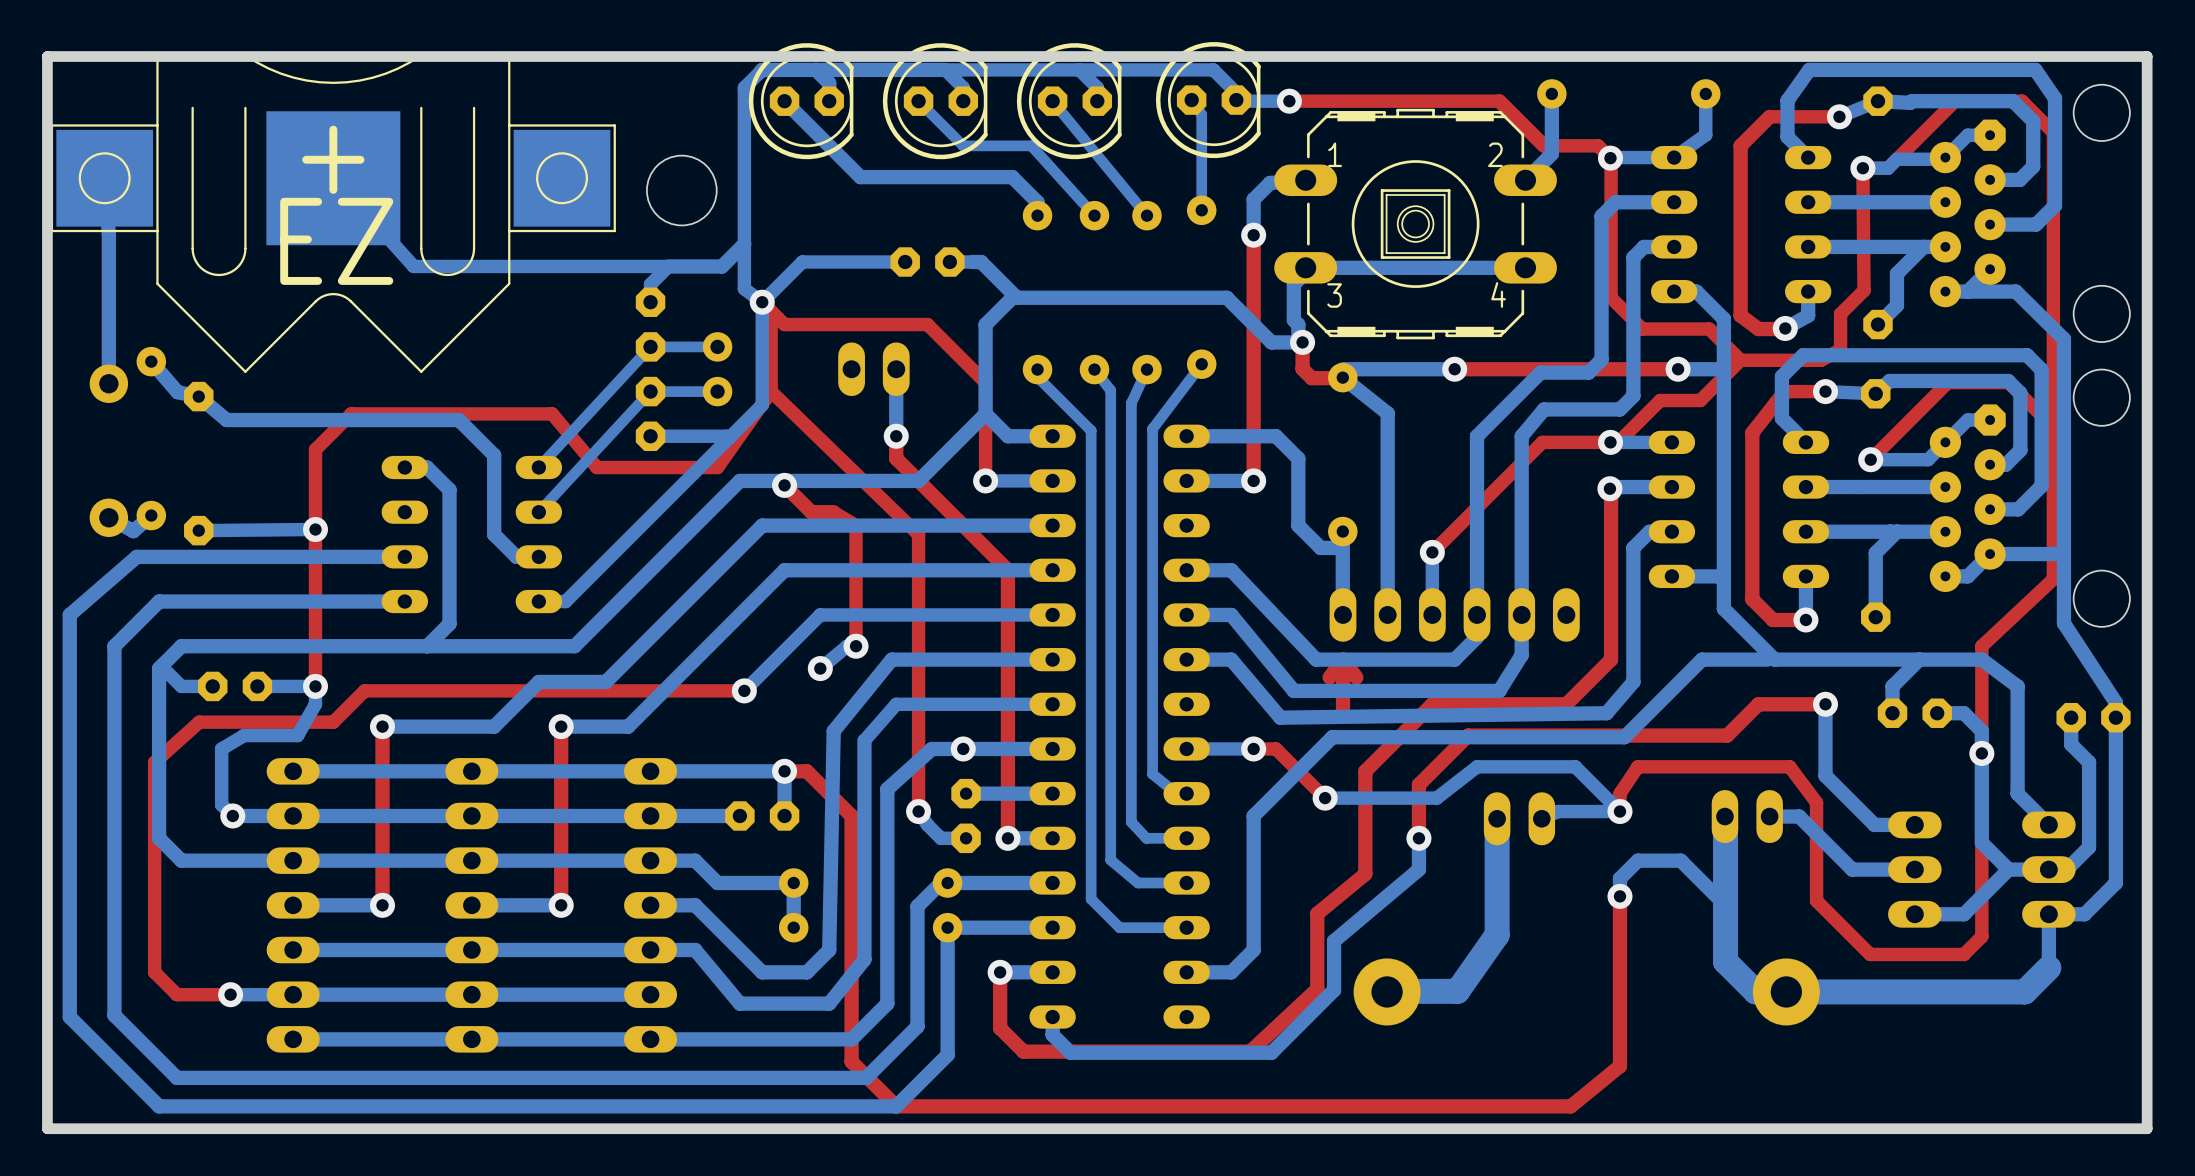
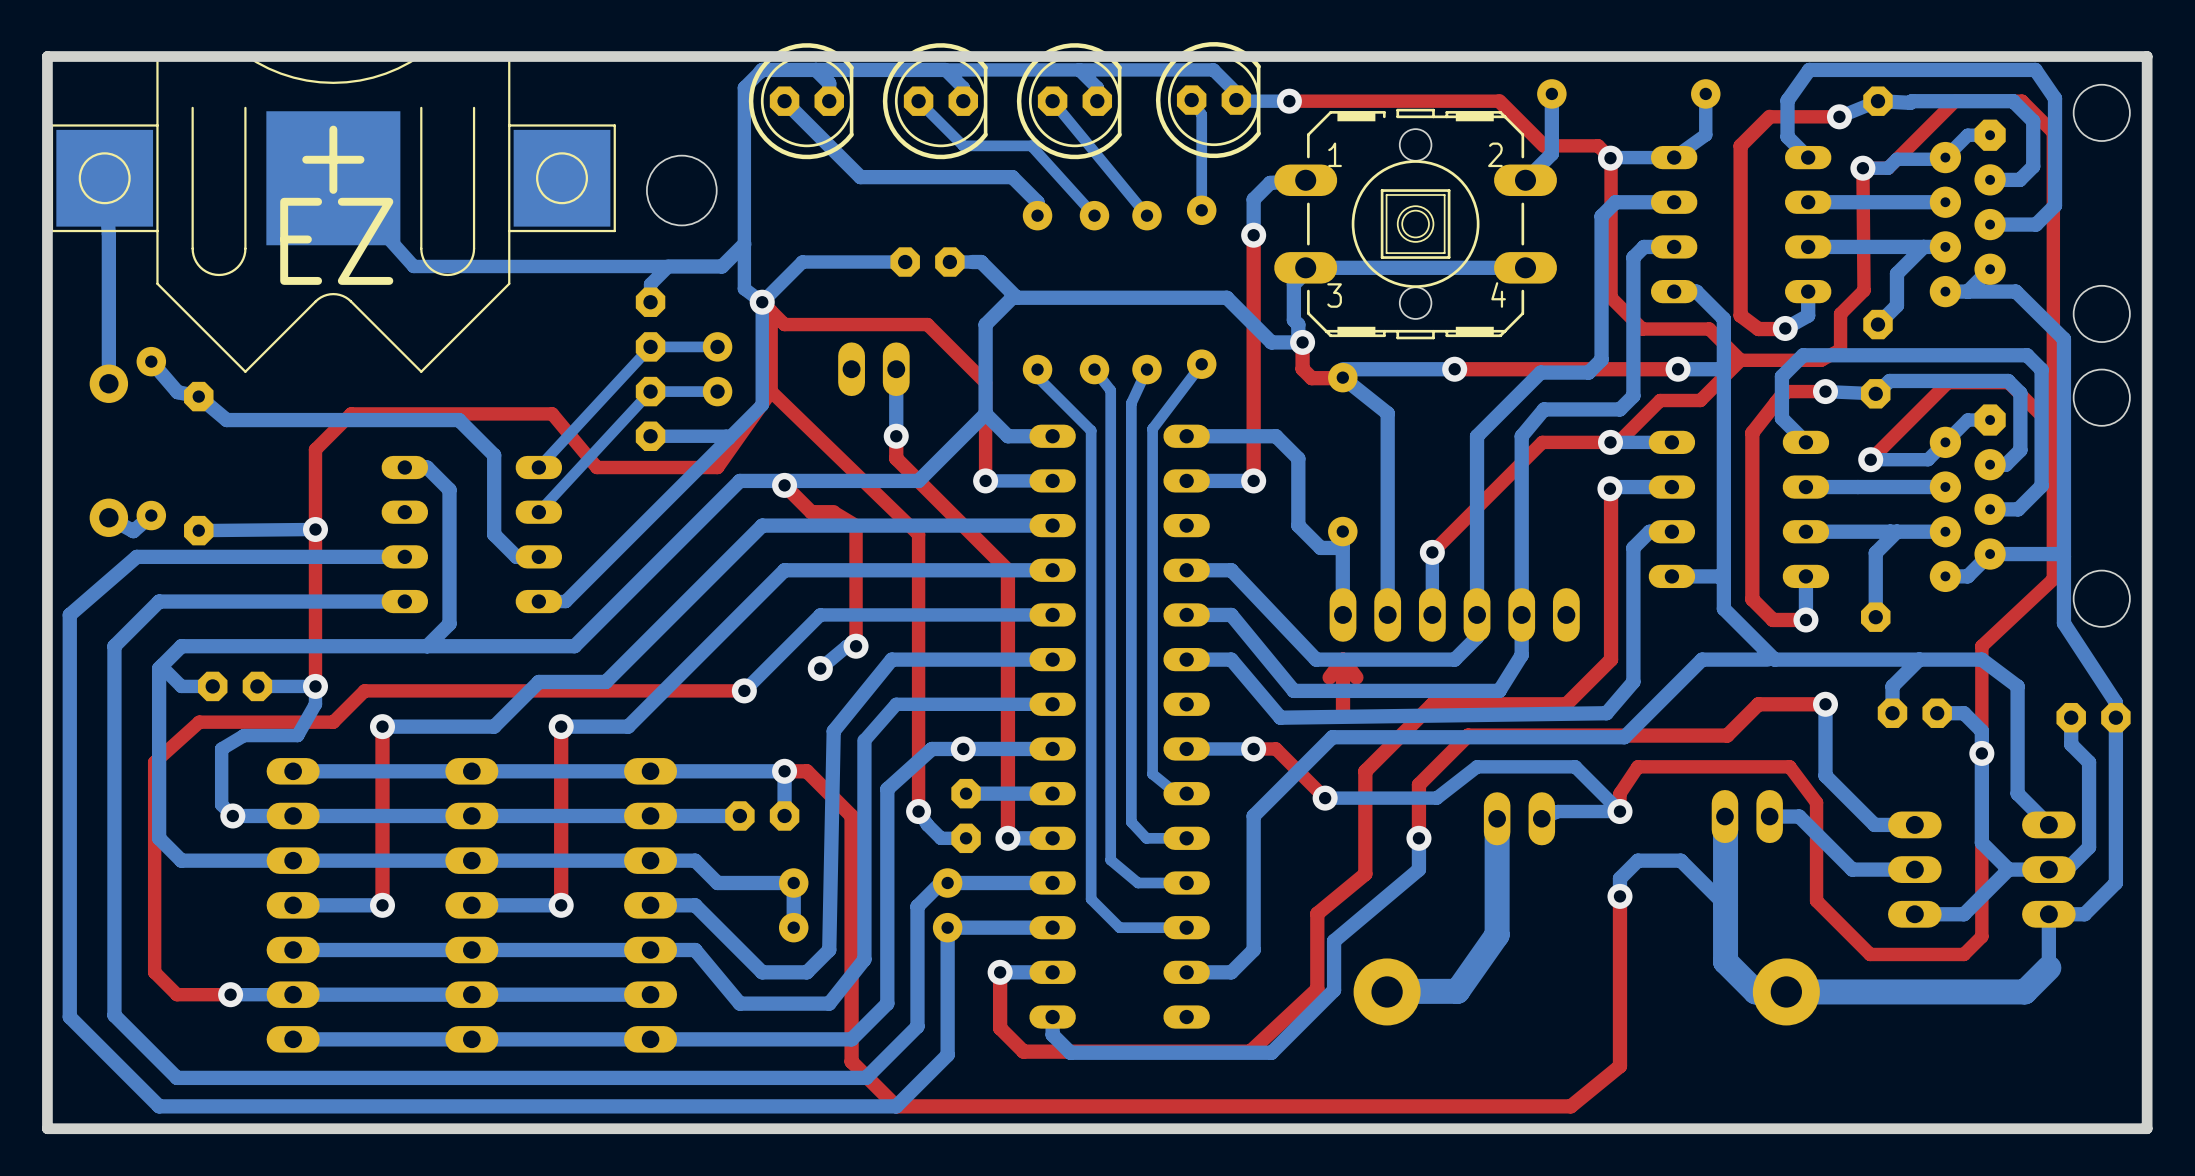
part footprint: [1274, 108, 1557, 340] -> [1274, 108, 1557, 340]

